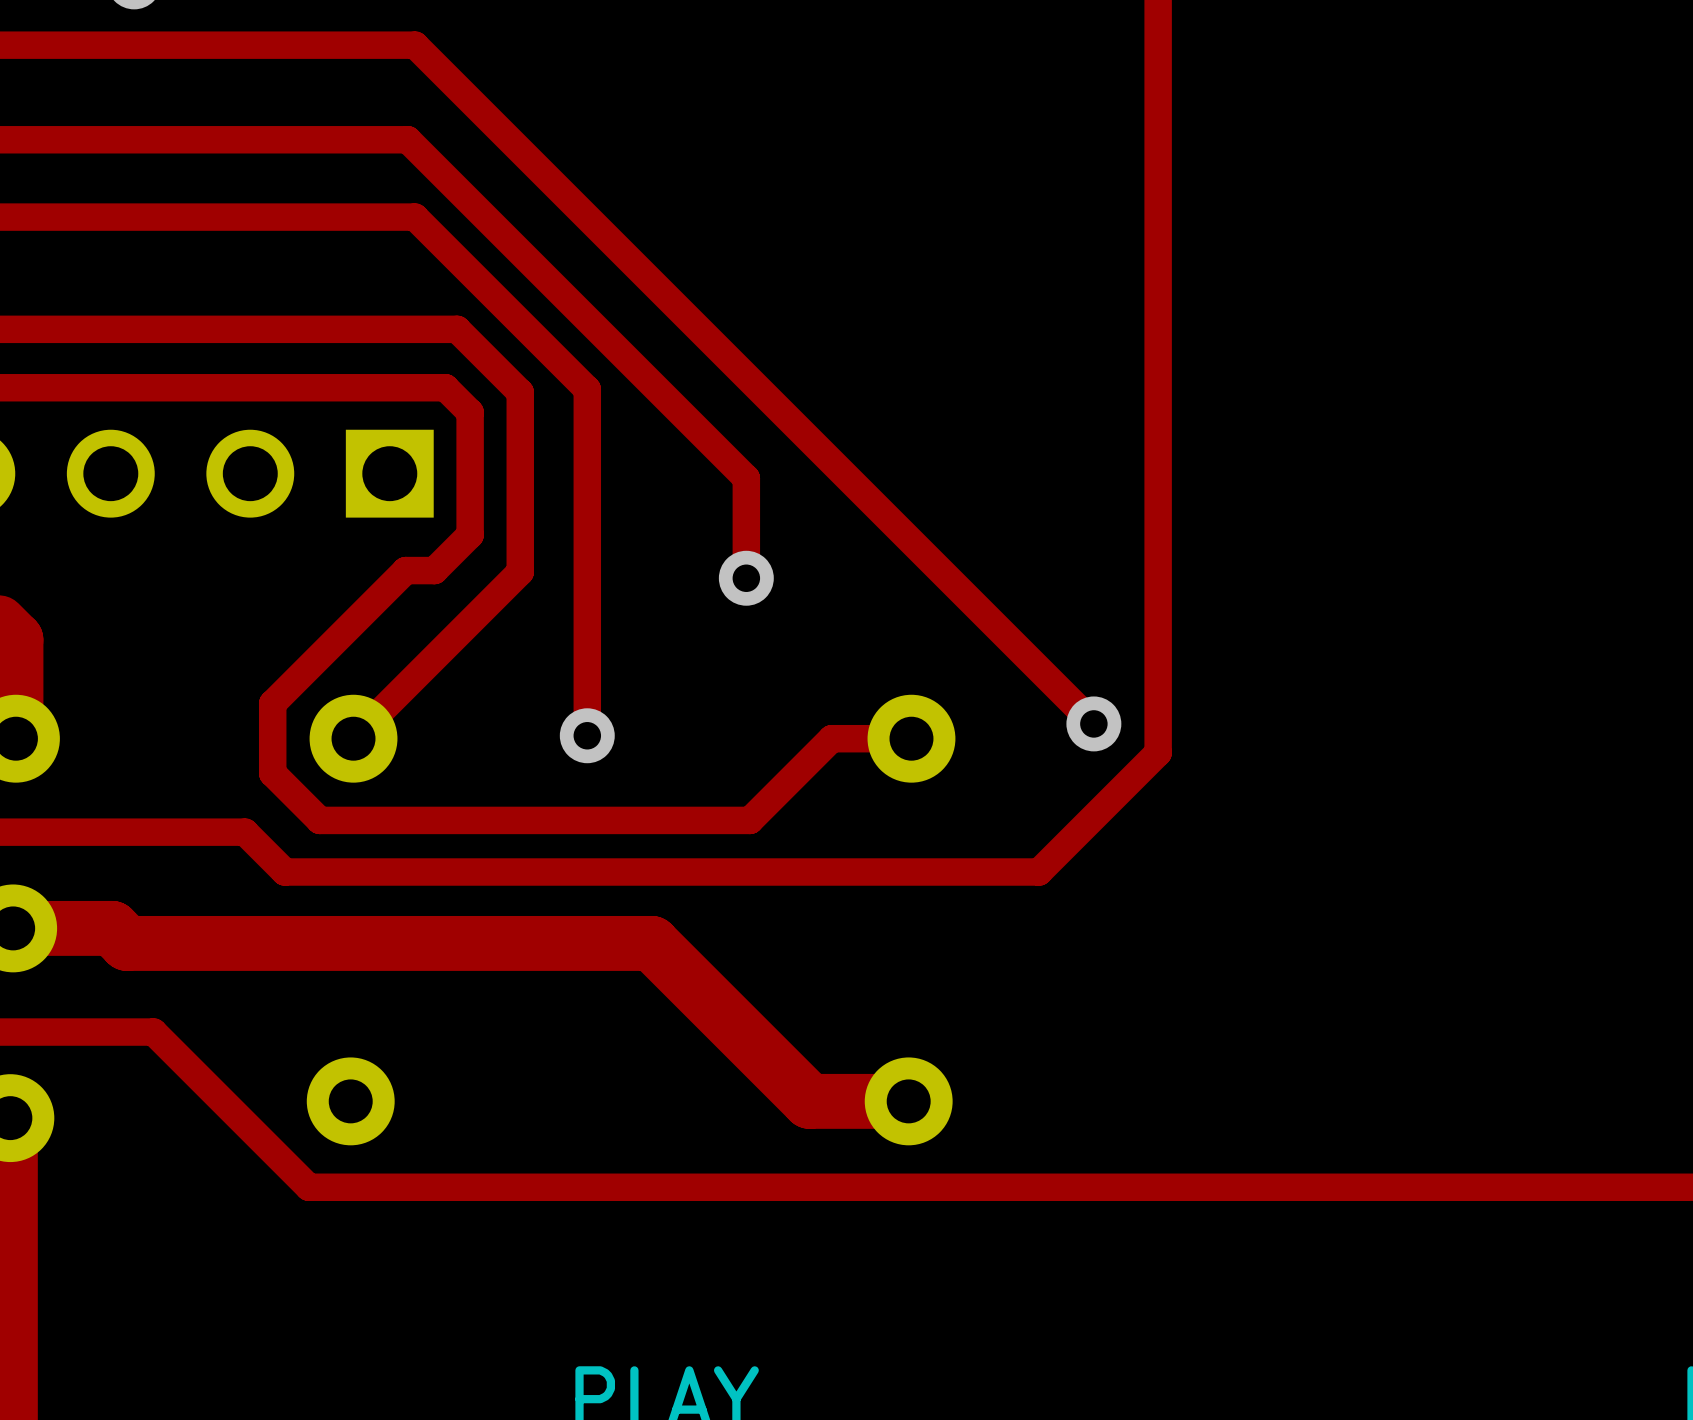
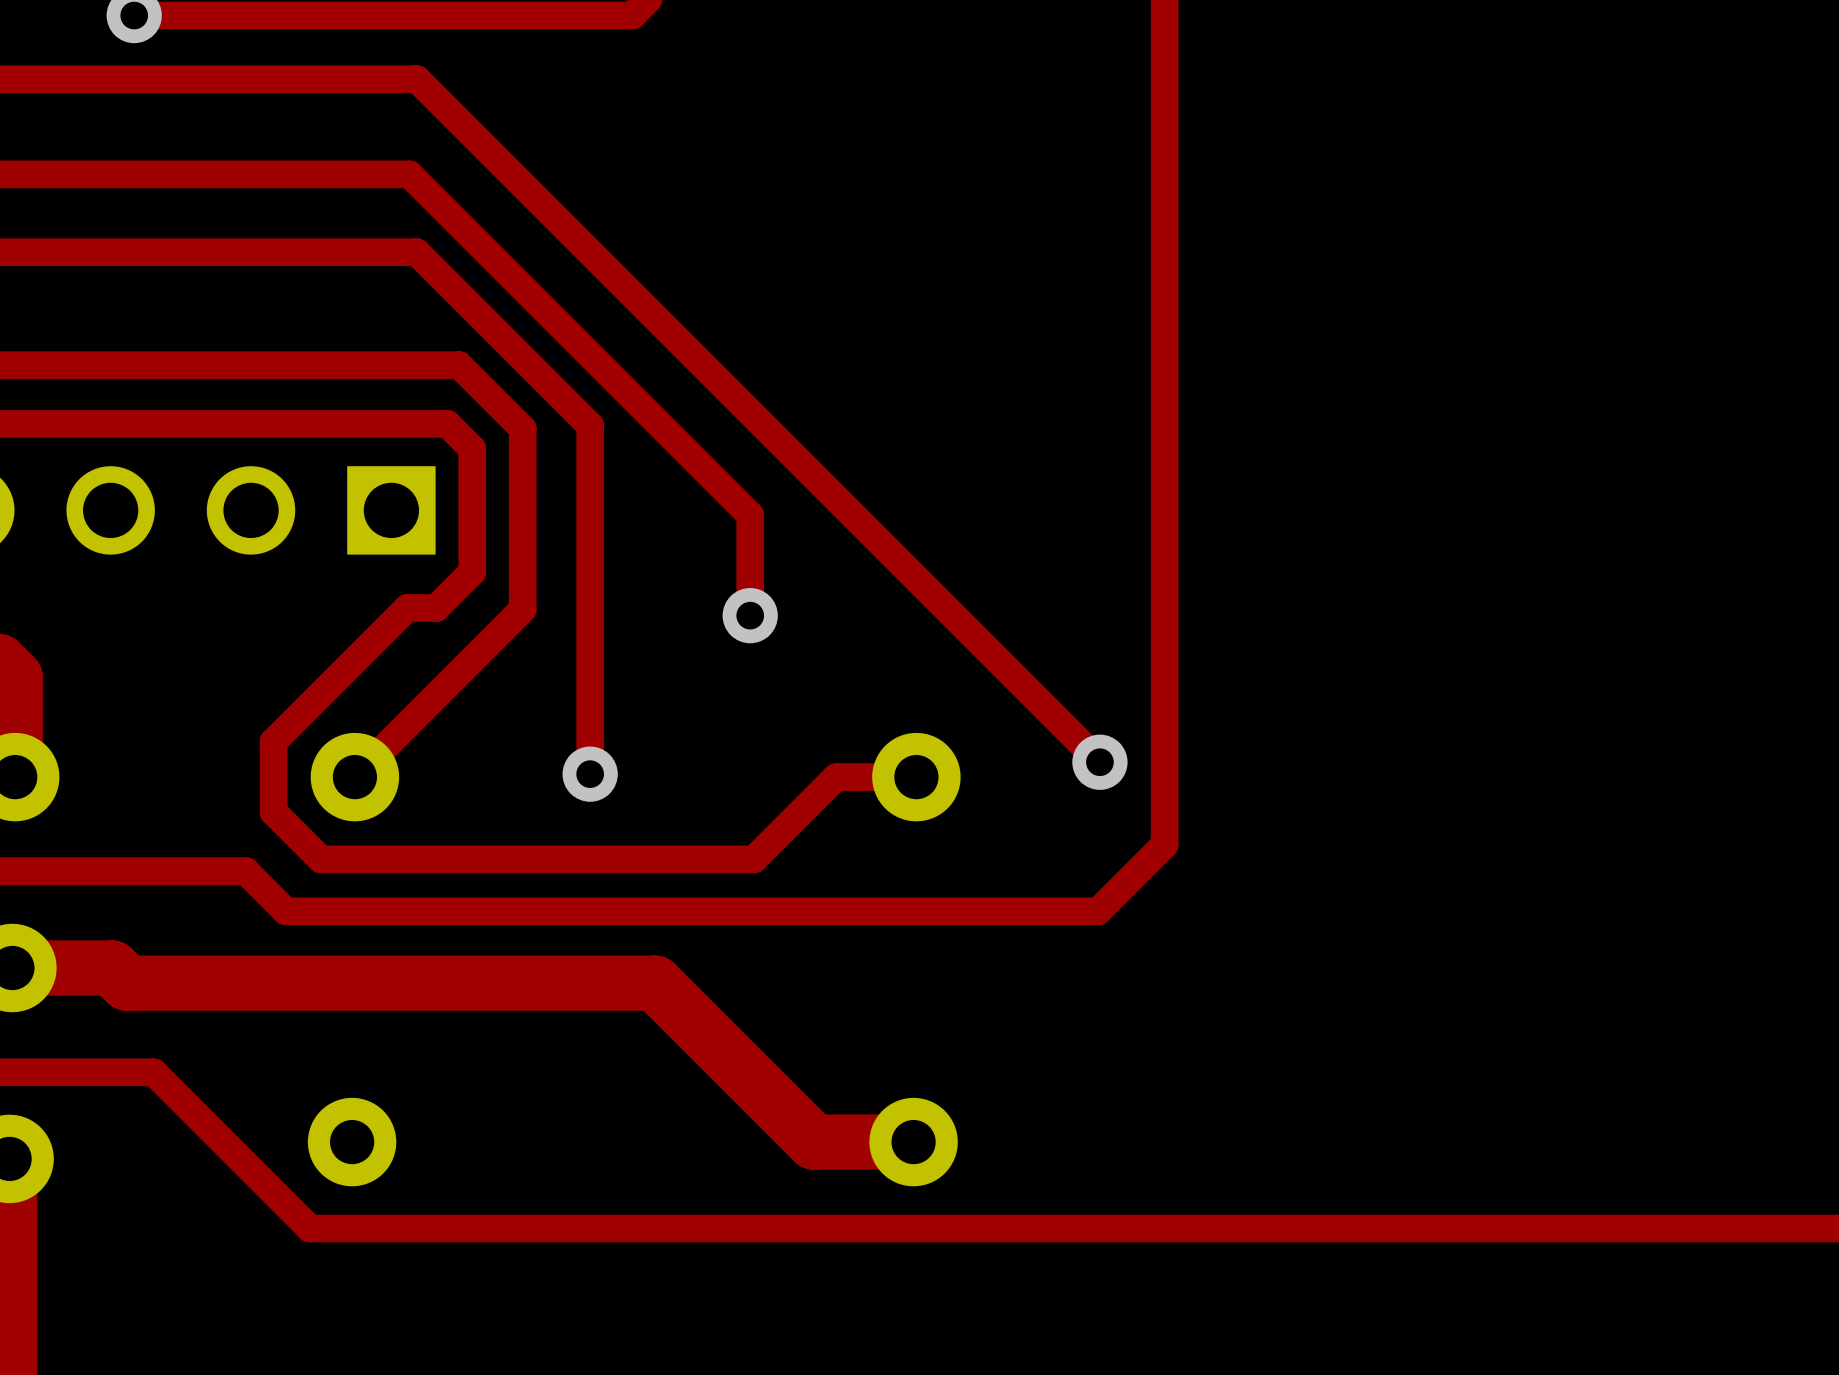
track: (1158, 752) (1038, 872) -> (1164, 791) (1164, 844) (1098, 911) (1044, 911)

